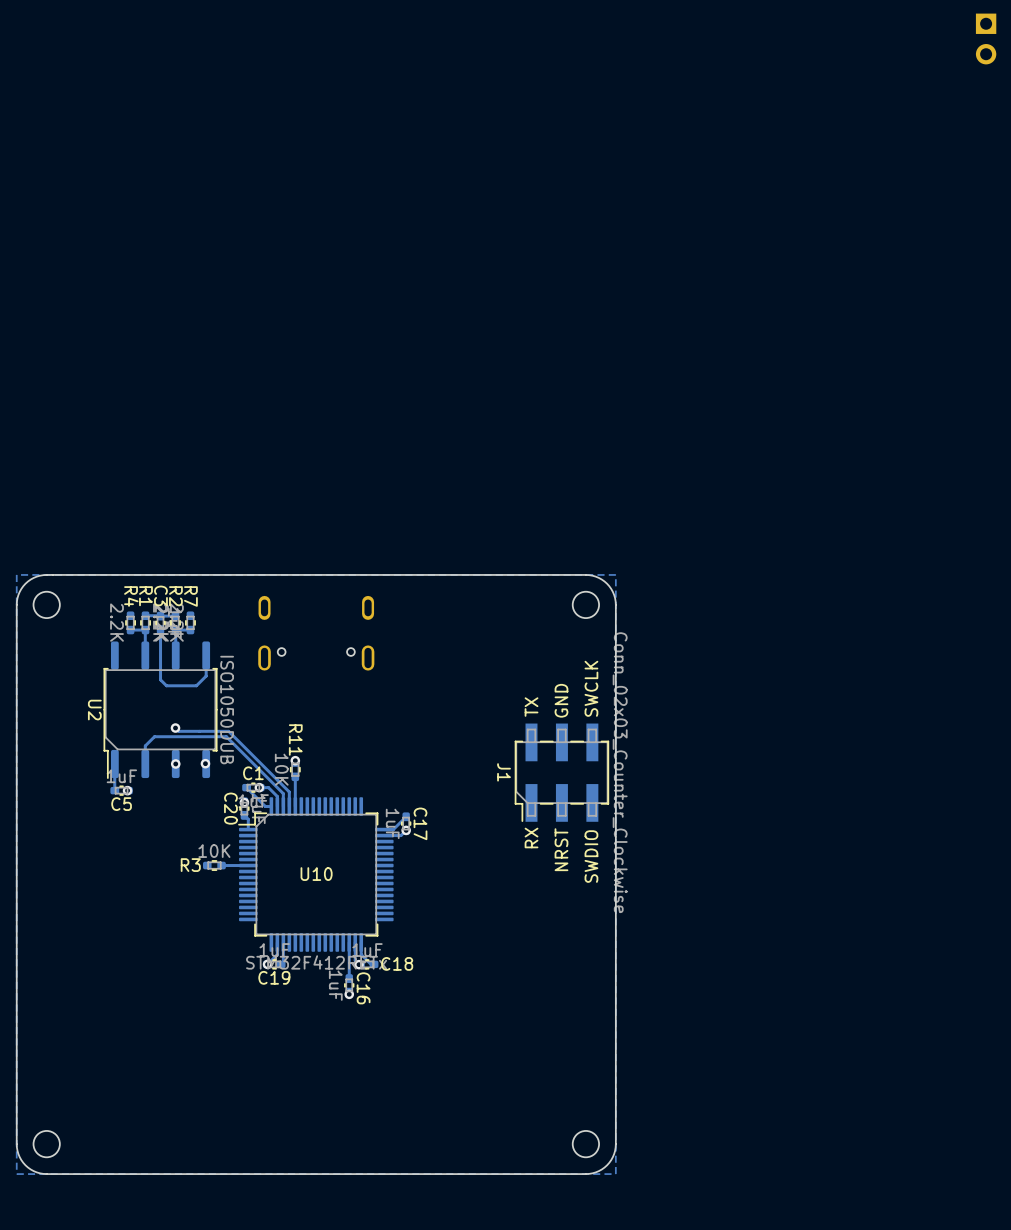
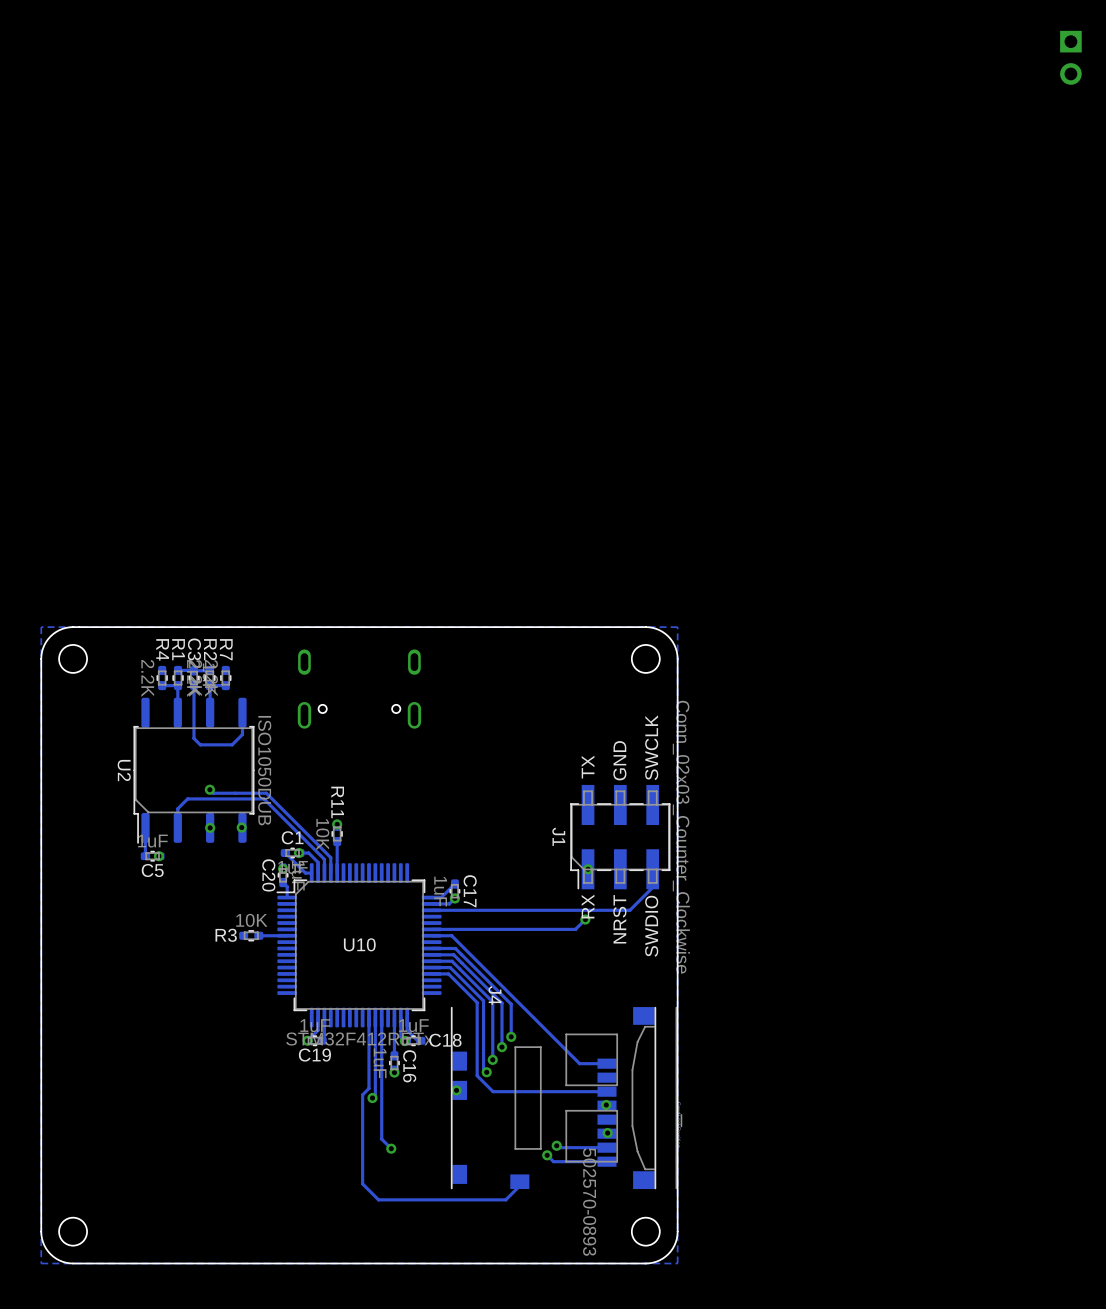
via: none -> (588, 869)
track: none -> (652, 869) (652, 887) (629, 910) (431, 910)
track: none -> (585, 919) (575, 929) (431, 929)
via: none -> (585, 919)
track: none -> (431, 935) (451, 935) (579, 1063) (607, 1063)
track: none -> (431, 948) (455, 948) (511, 1004) (511, 1036)
track: none -> (431, 954) (453, 954) (501, 1003) (501, 1047)
track: none -> (431, 961) (451, 961) (492, 1001) (492, 1059)
track: none -> (431, 967) (450, 967) (483, 1000) (483, 1069) (486, 1072)
track: none -> (431, 973) (448, 973) (477, 1002) (477, 1075) (493, 1091) (607, 1091)
track: none -> (368, 1017) (368, 1088) (362, 1094) (362, 1183) (378, 1199) (505, 1199) (519, 1185) (519, 1181)
track: none -> (375, 1017) (375, 1095) (372, 1098)
track: none -> (381, 1017) (381, 1139) (391, 1148)
via: none -> (511, 1036)
via: none -> (501, 1047)
via: none -> (492, 1059)
via: none -> (486, 1072)
via: none -> (456, 1090)
via: none -> (372, 1098)
J4: none -> 502570-0893 (564, 1098)
via: none -> (606, 1105)
via: none -> (607, 1133)
track: none -> (556, 1145) (558, 1147) (607, 1147)
via: none -> (556, 1145)
via: none -> (391, 1148)
track: none -> (547, 1155) (553, 1161) (607, 1161)
via: none -> (547, 1155)

